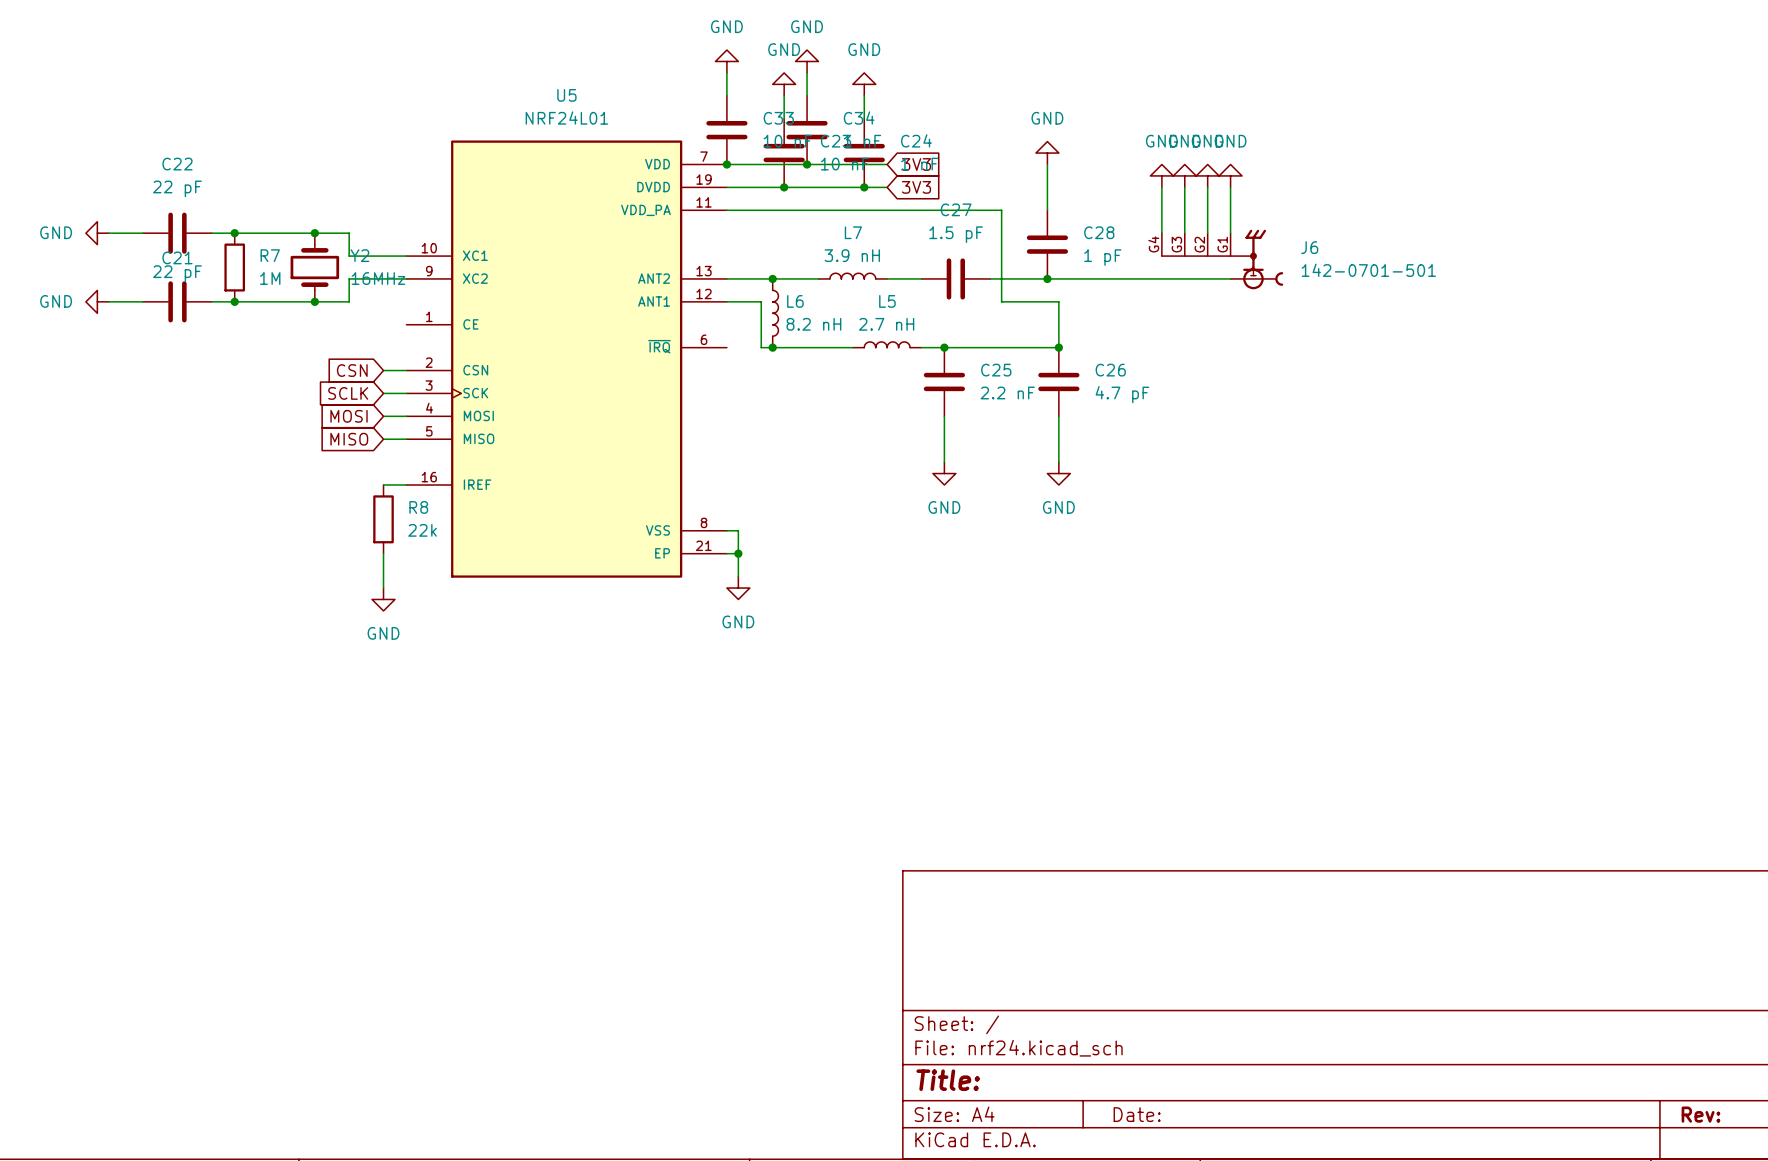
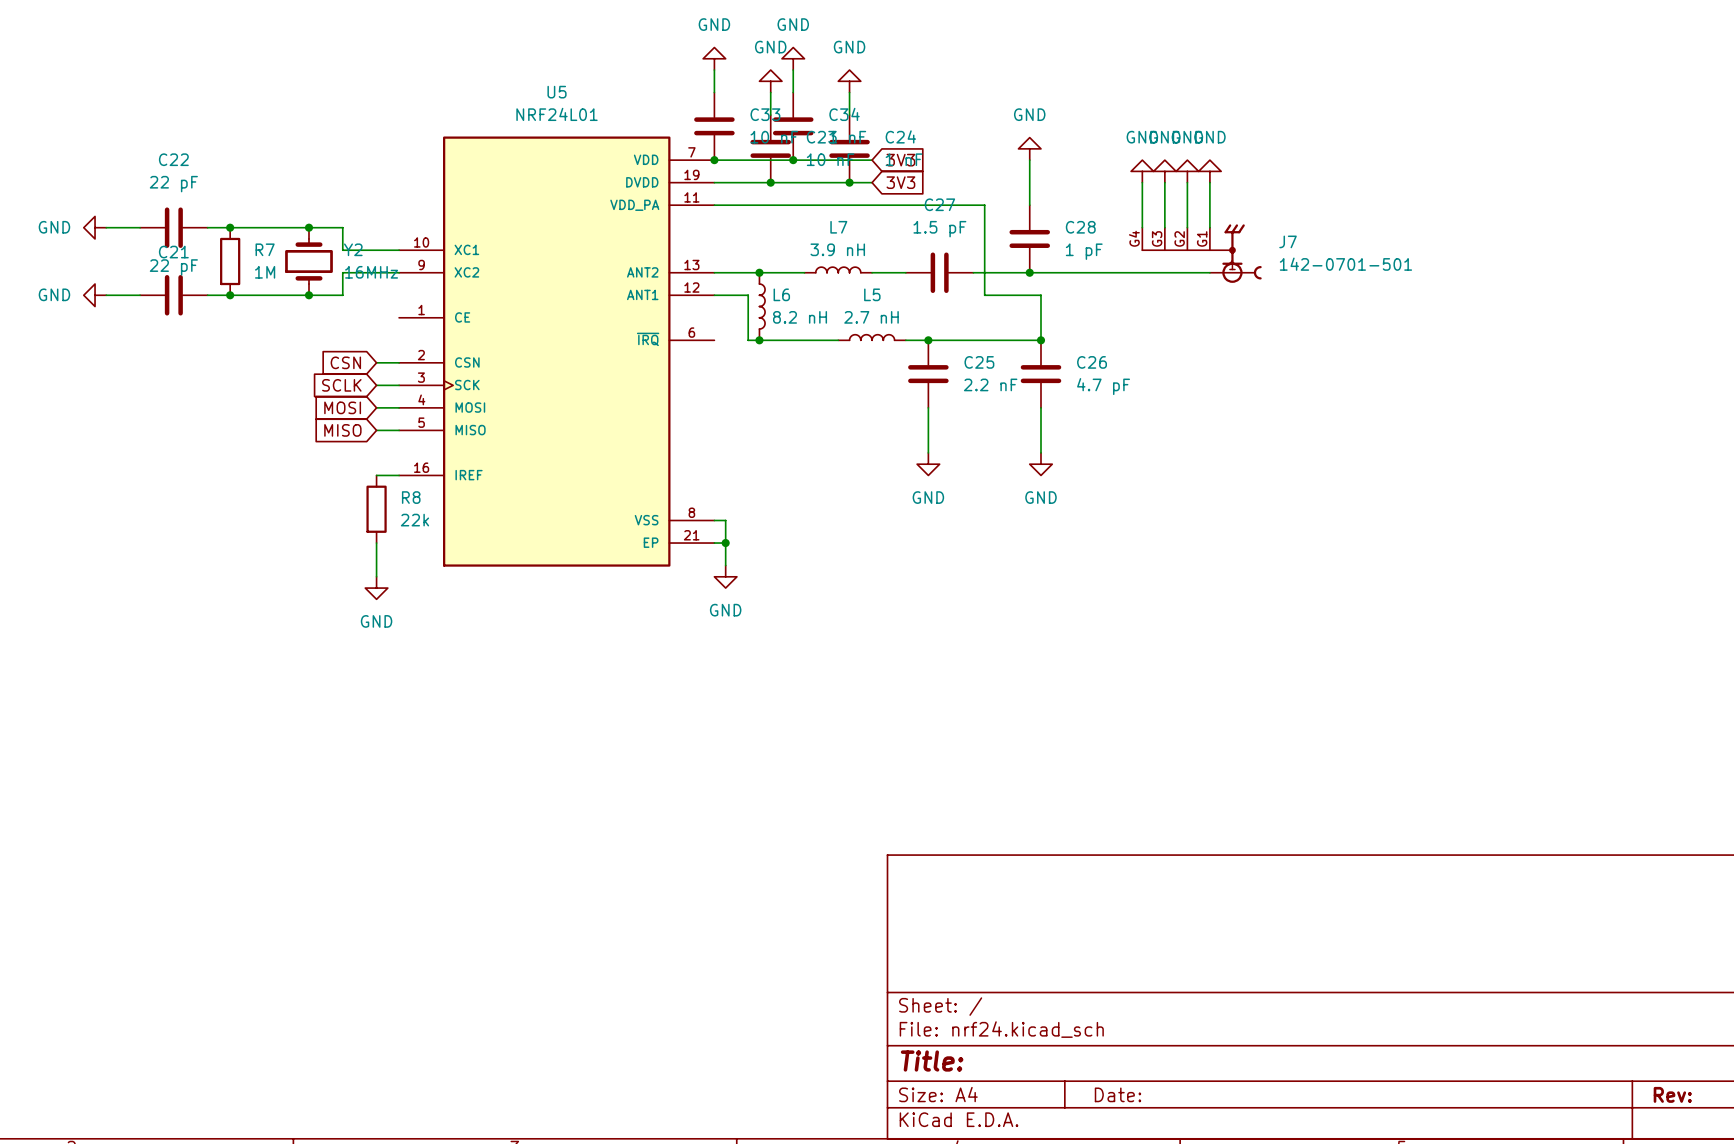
J6 name: J6 (1309, 247) -> J7 (1288, 241)

